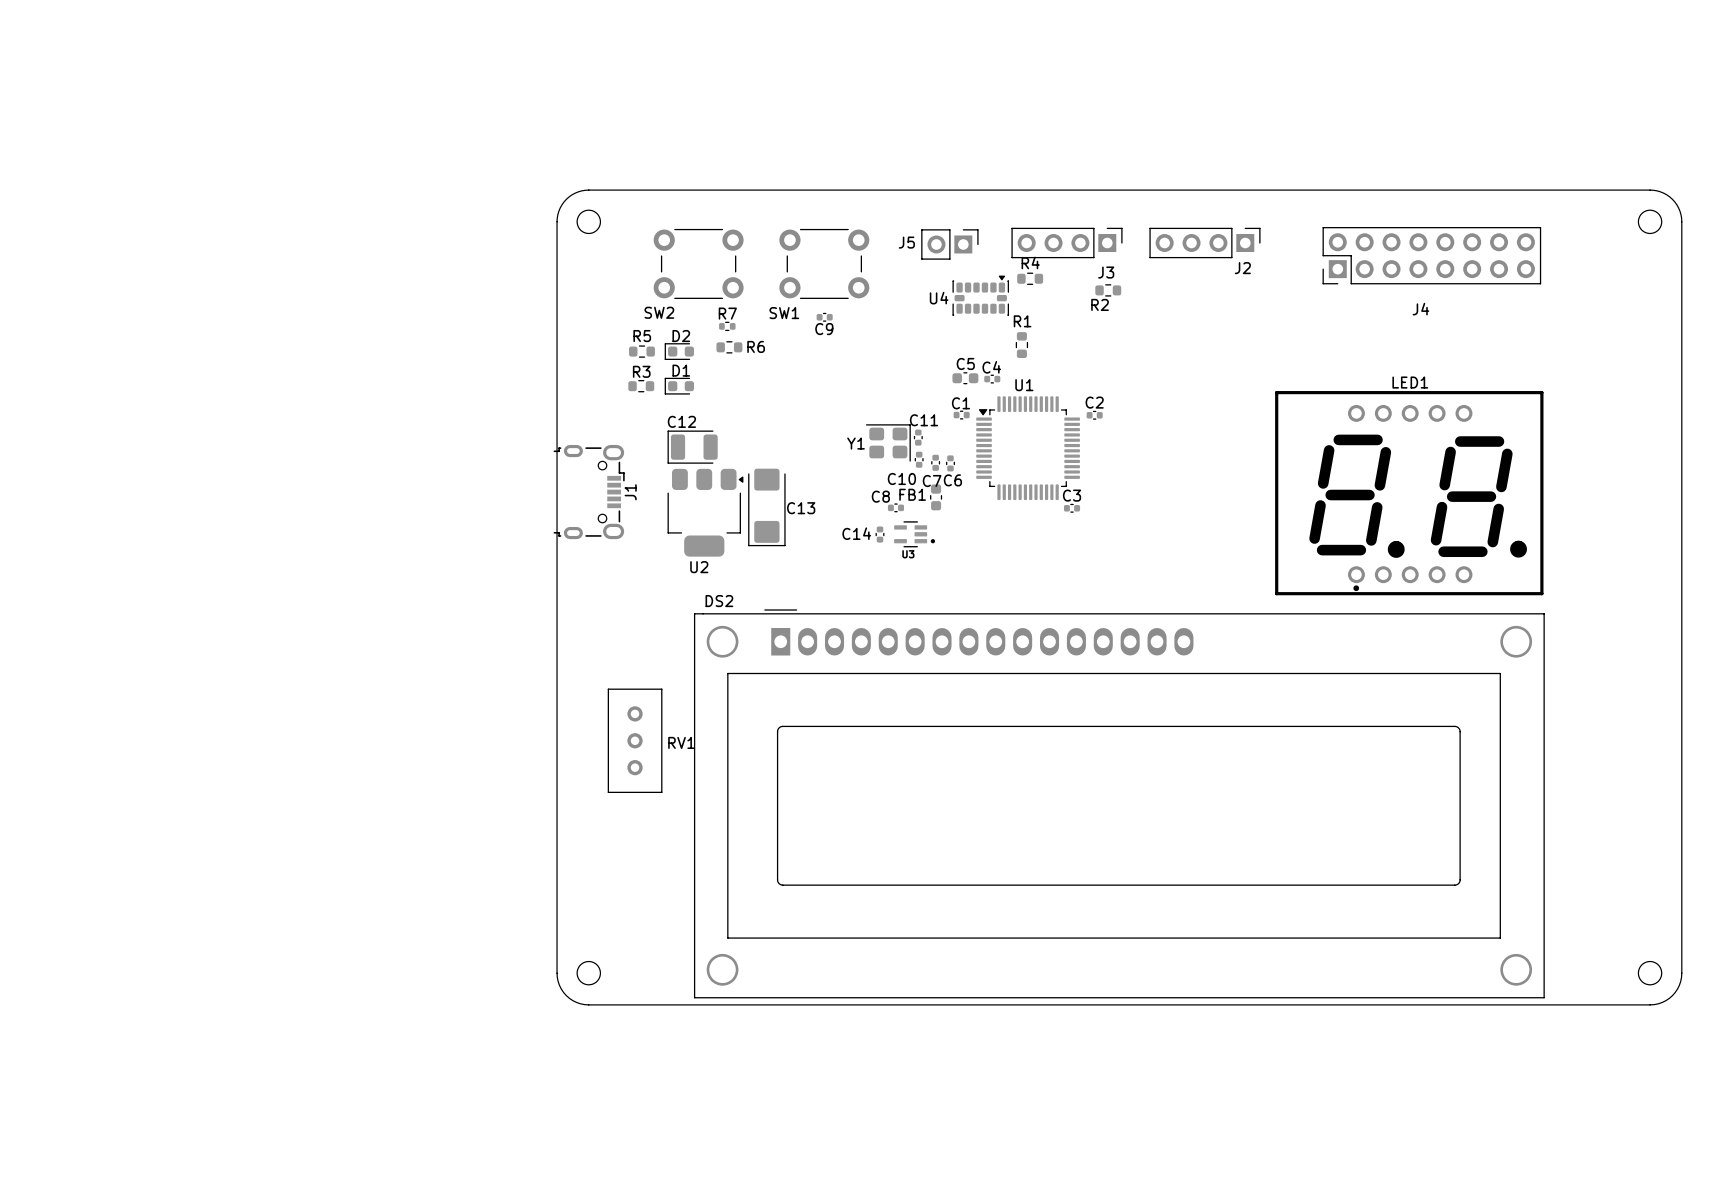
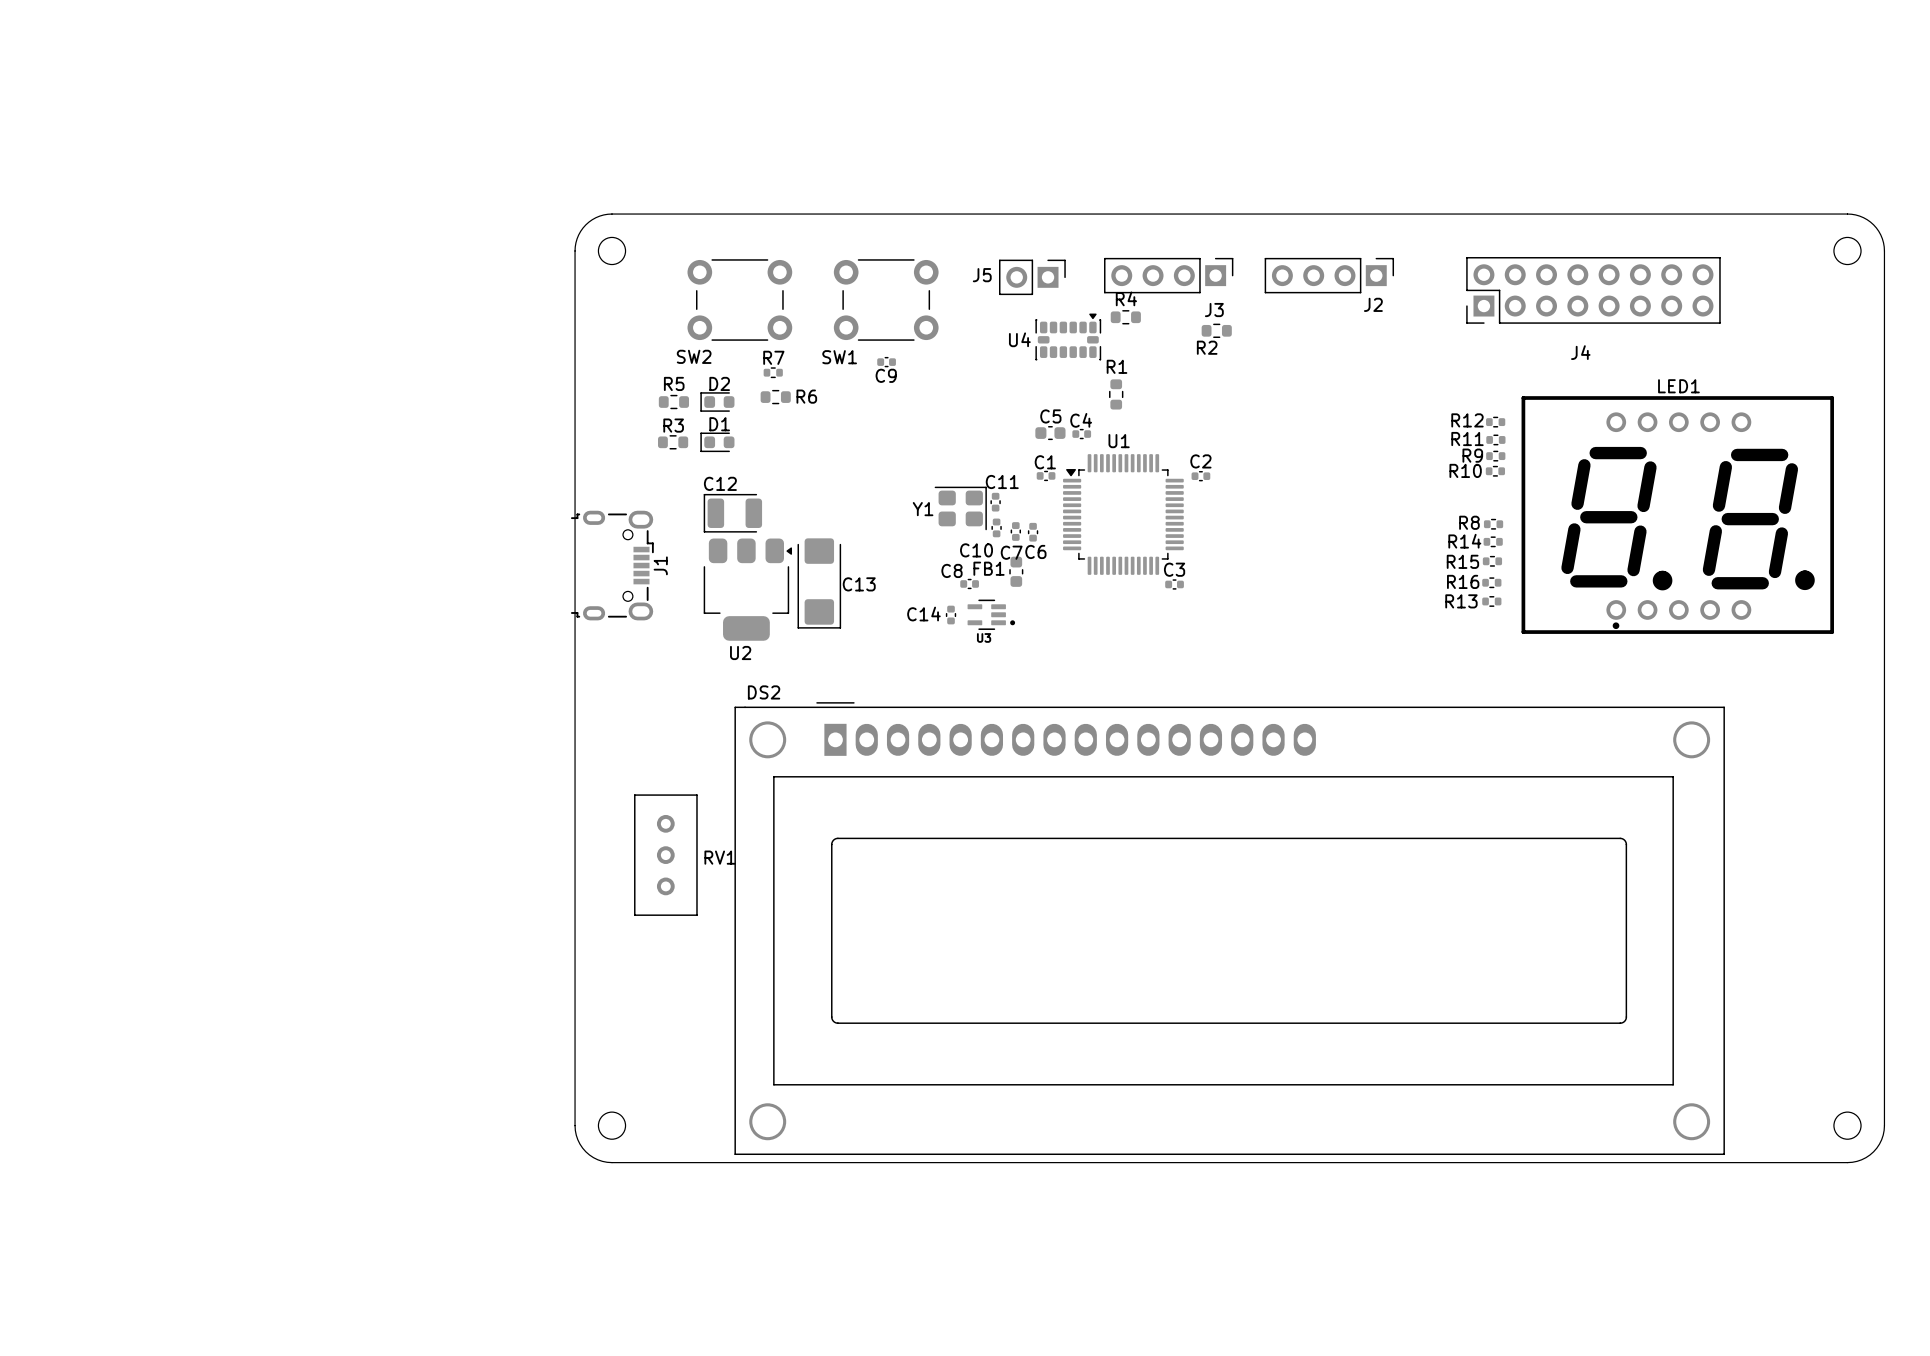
R12: none -> (1495, 422)
R11: none -> (1495, 439)
R9: none -> (1495, 456)
R10: none -> (1495, 471)
R8: none -> (1493, 524)
R14: none -> (1493, 541)
R15: none -> (1492, 561)
LED1 position: (1409, 493) -> (1677, 515)
R16: none -> (1491, 582)
R13: none -> (1491, 601)

